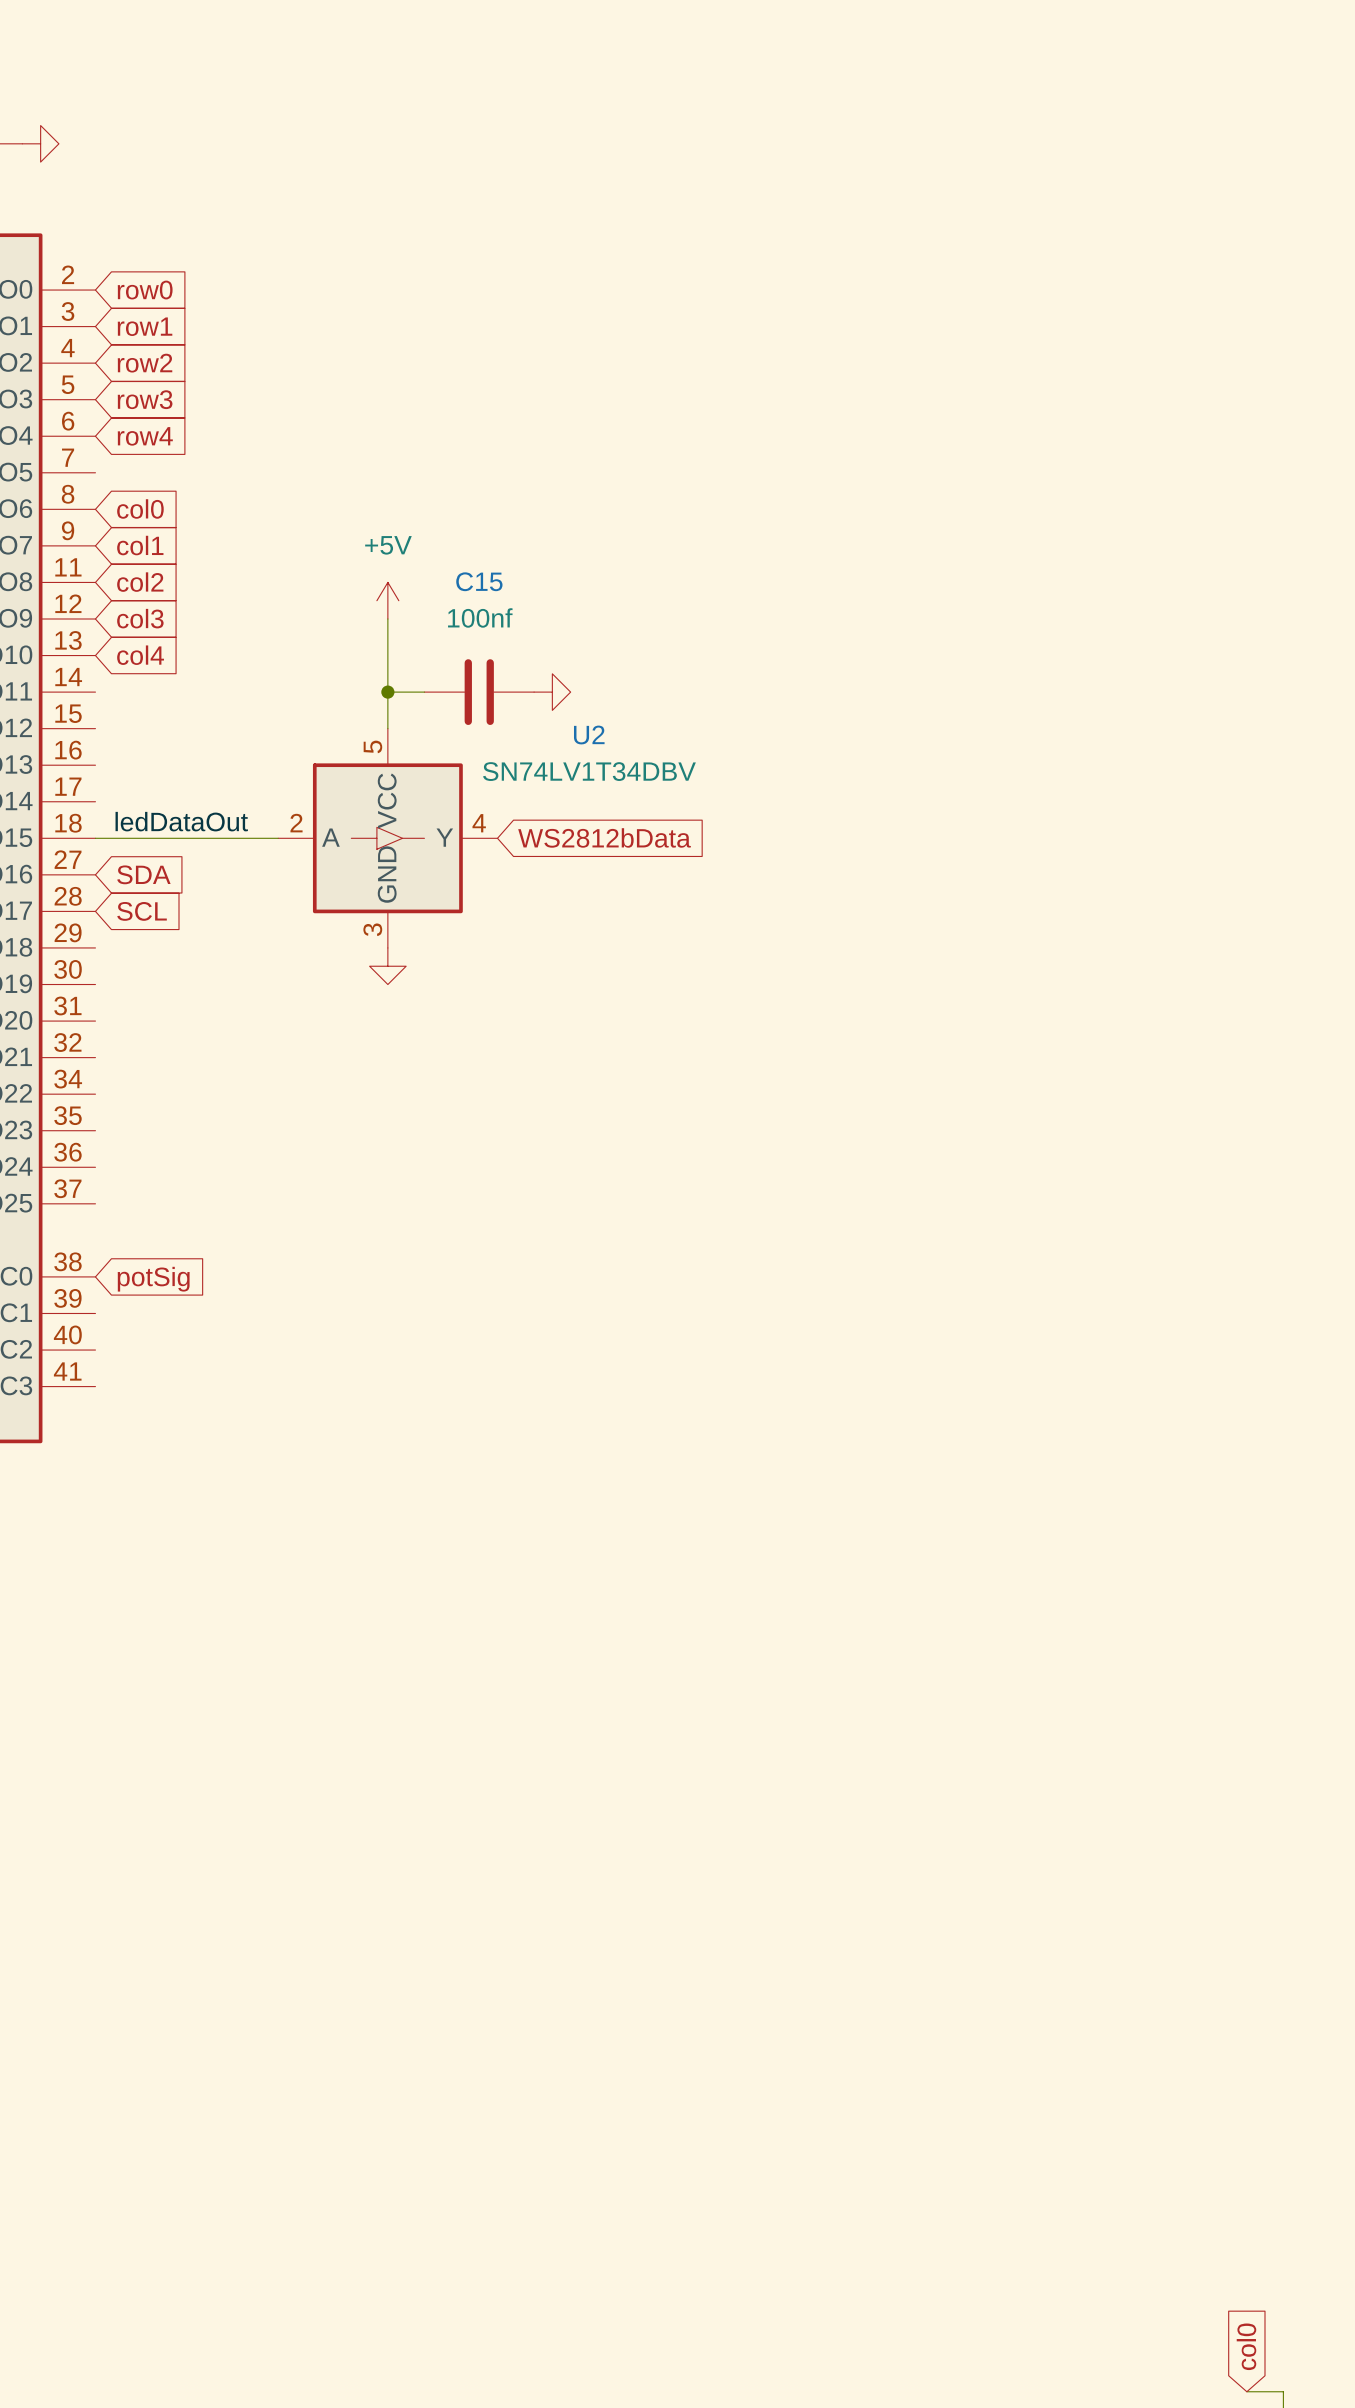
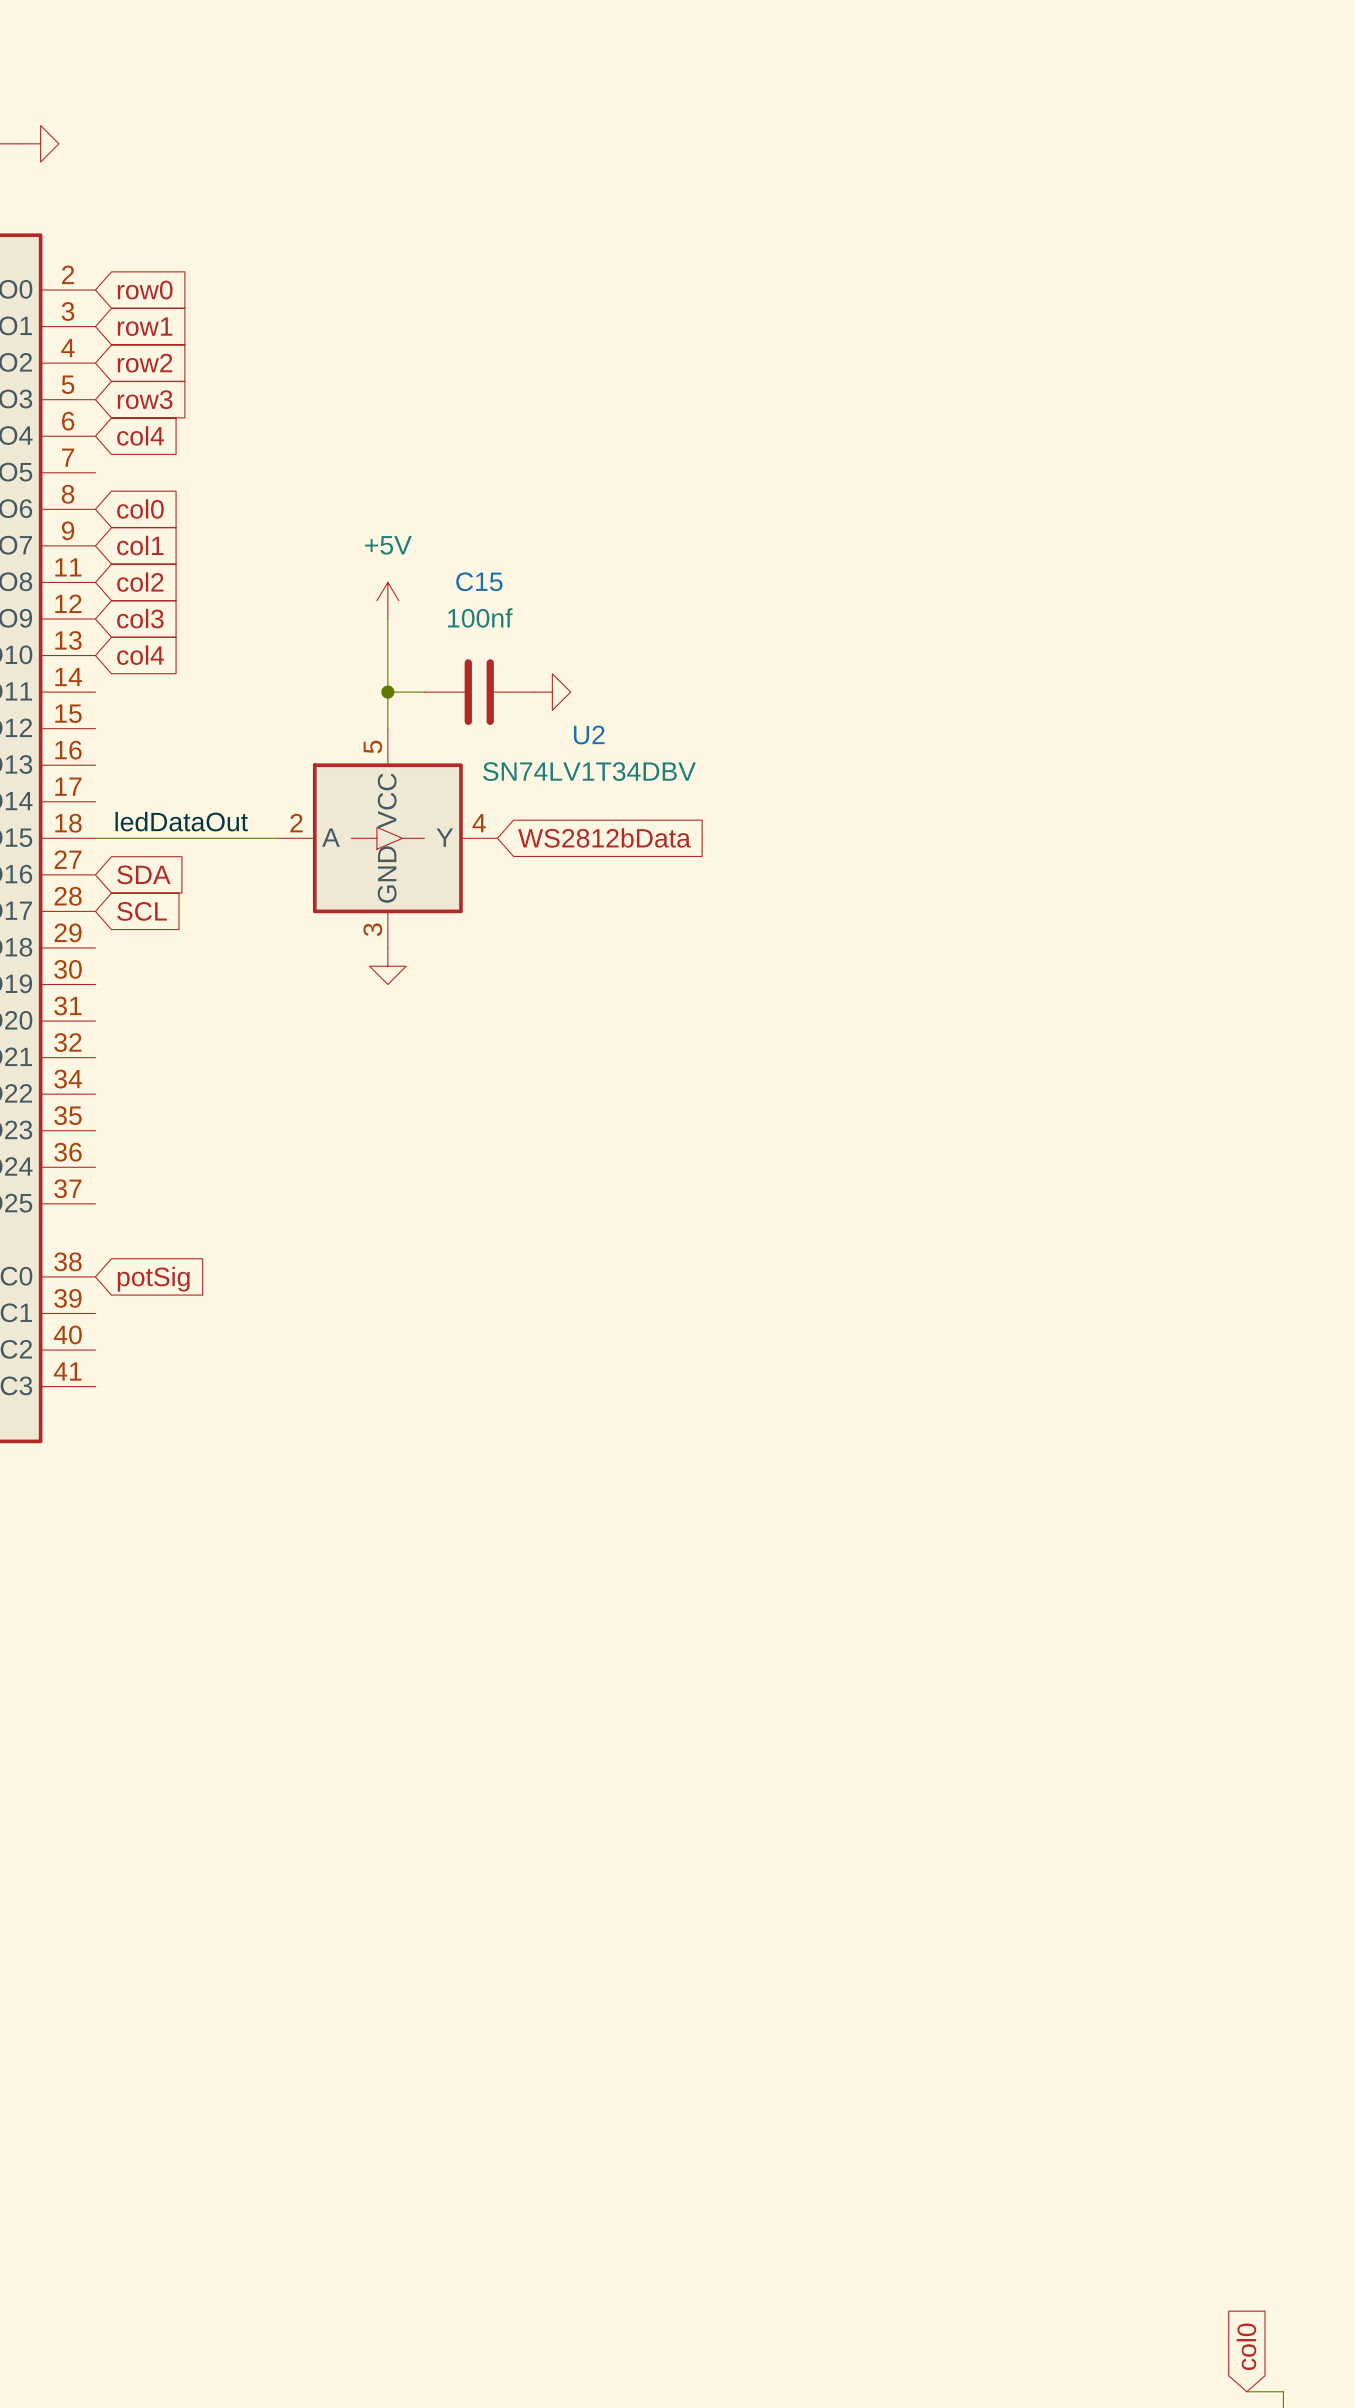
global label: row4 (145, 436) -> col4 (140, 435)

